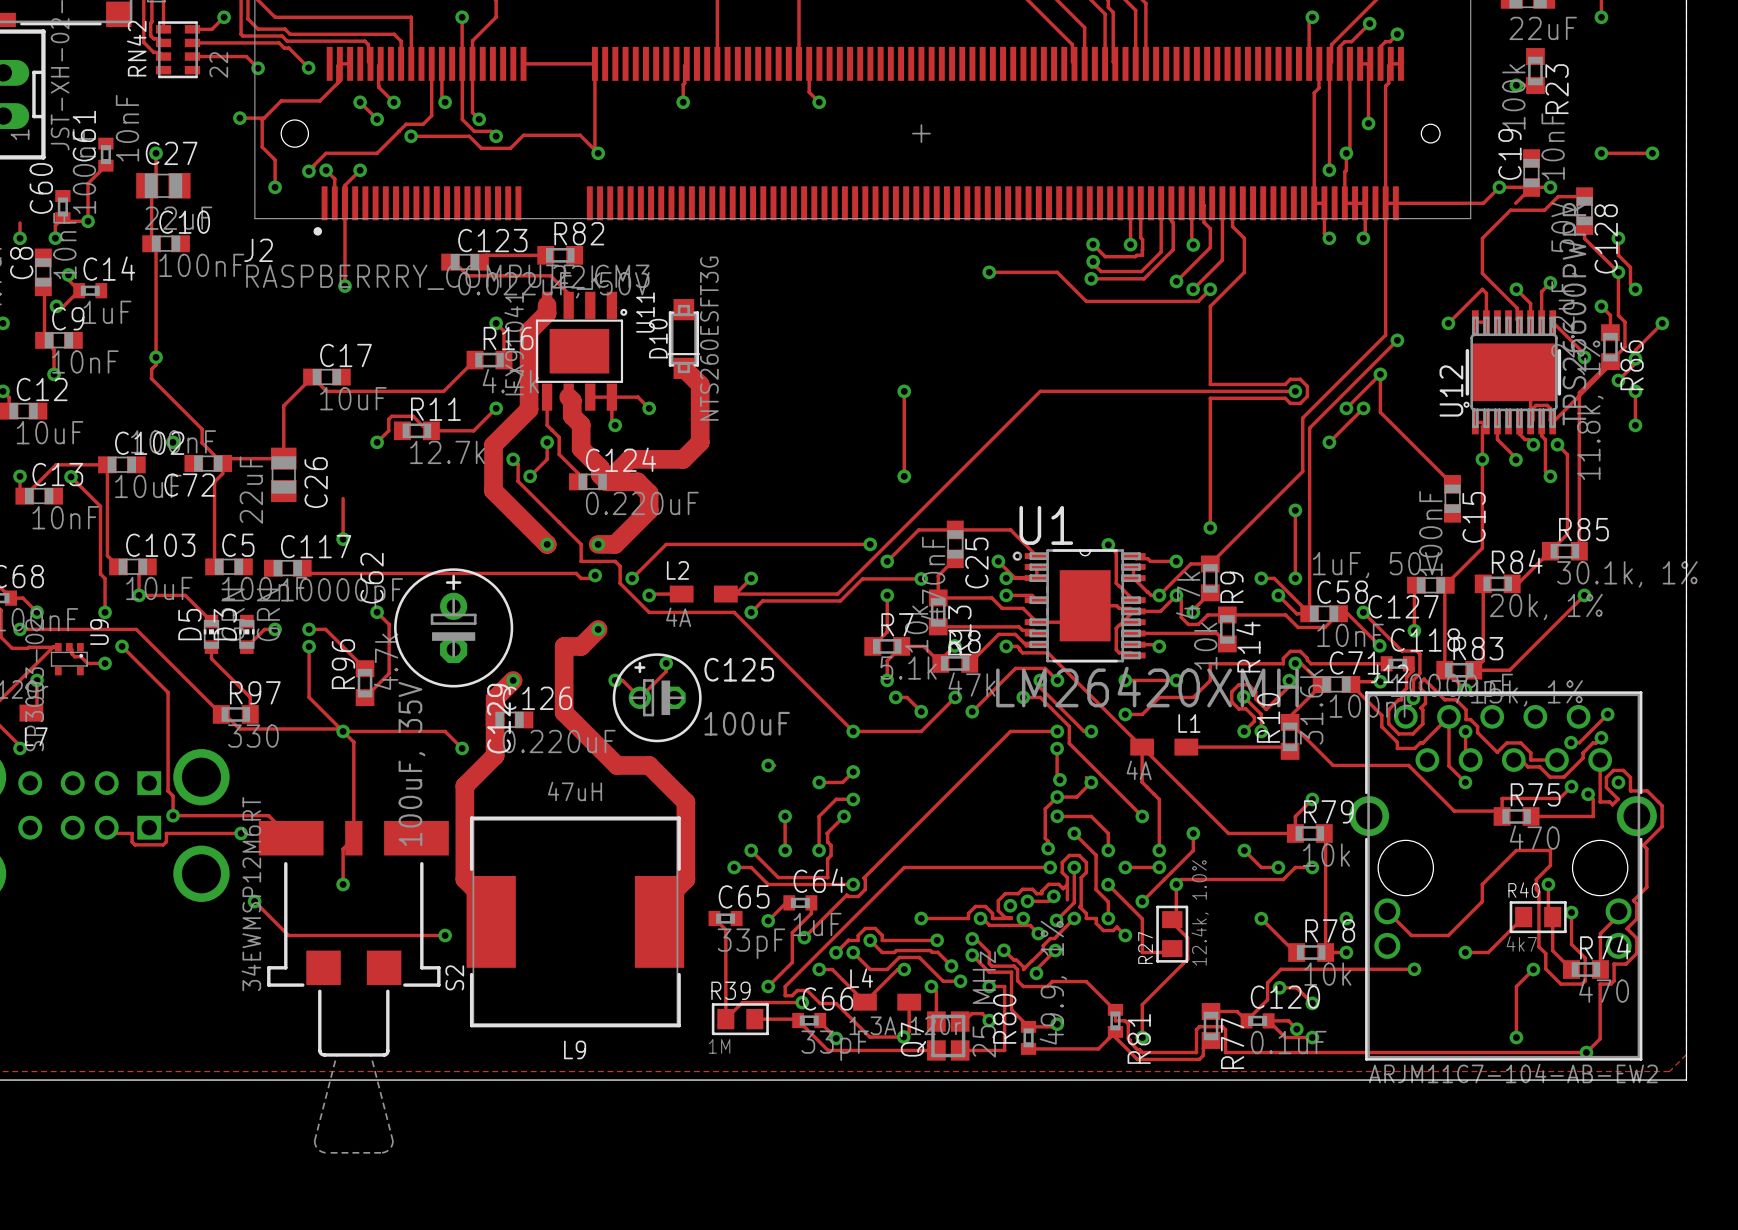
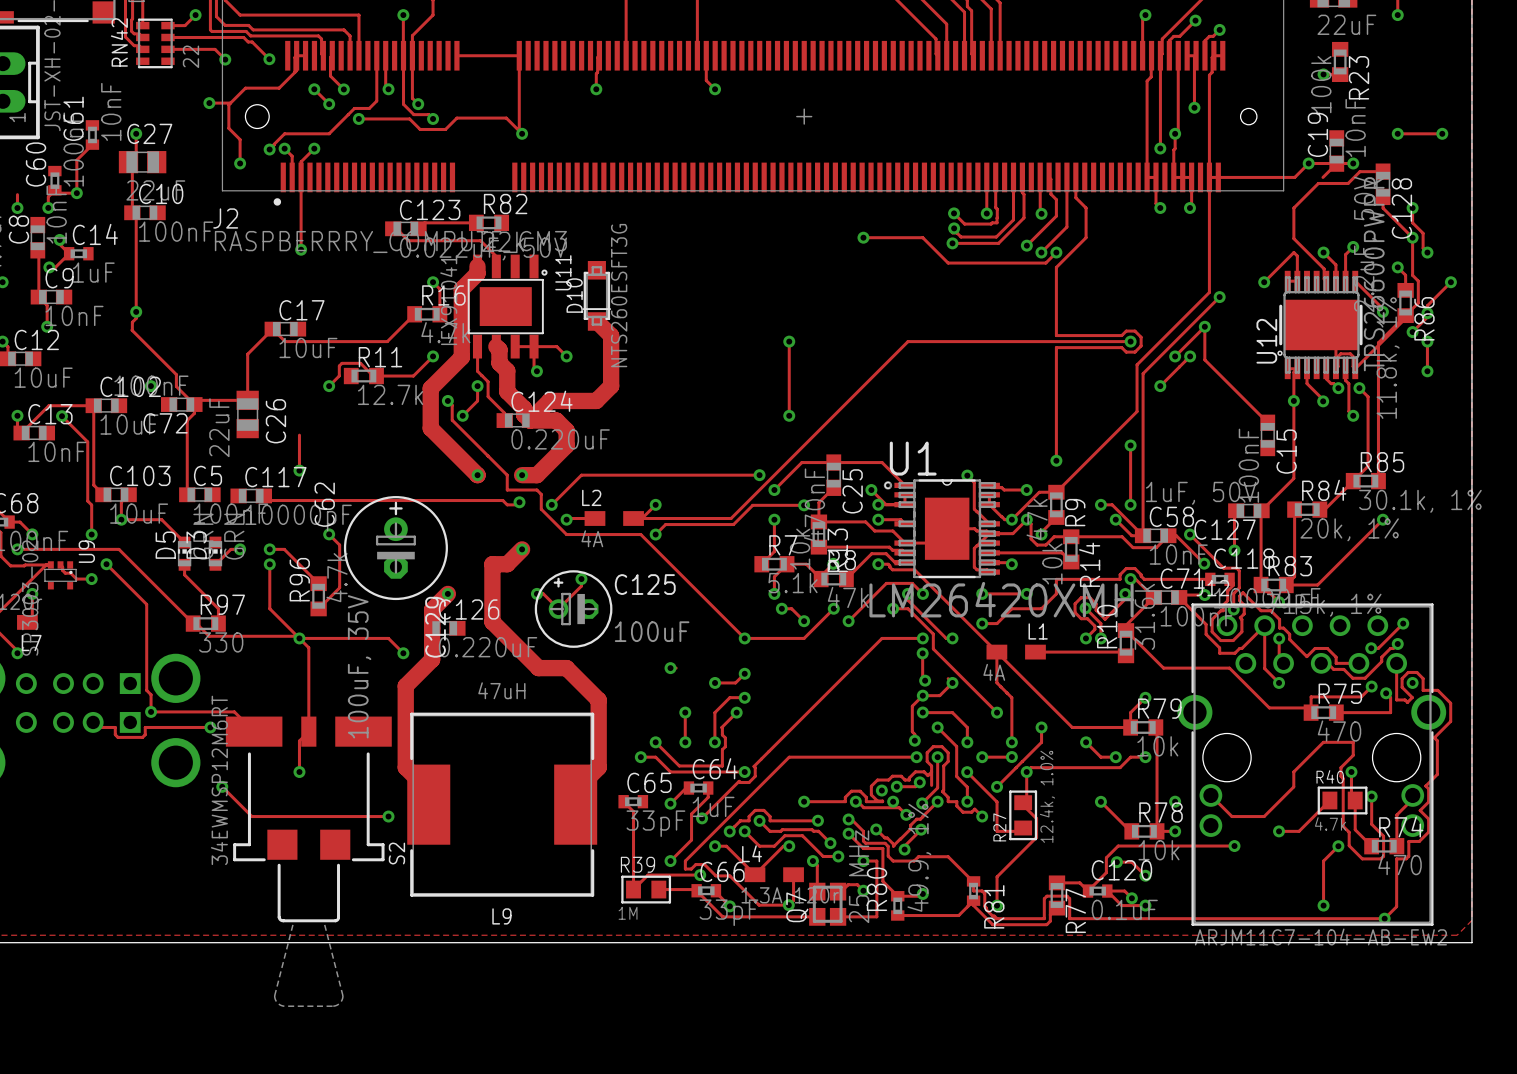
R40 value: 4k7 (1521, 944) -> 4.7k (1330, 823)

